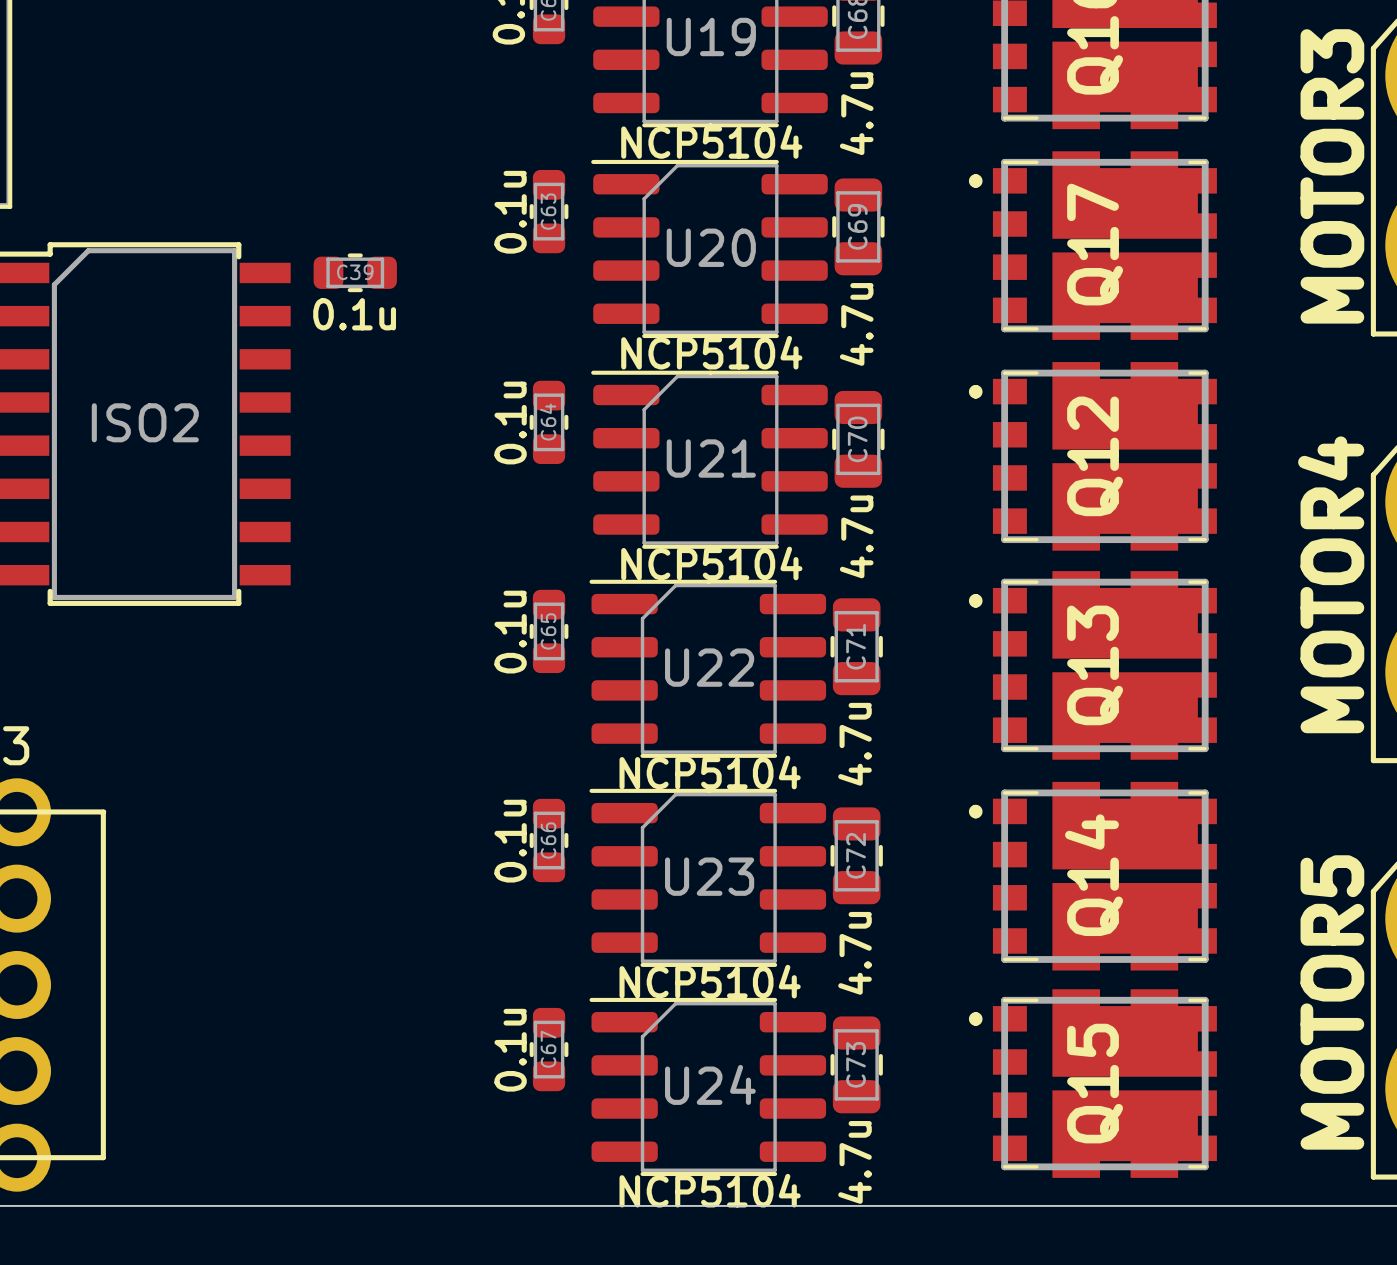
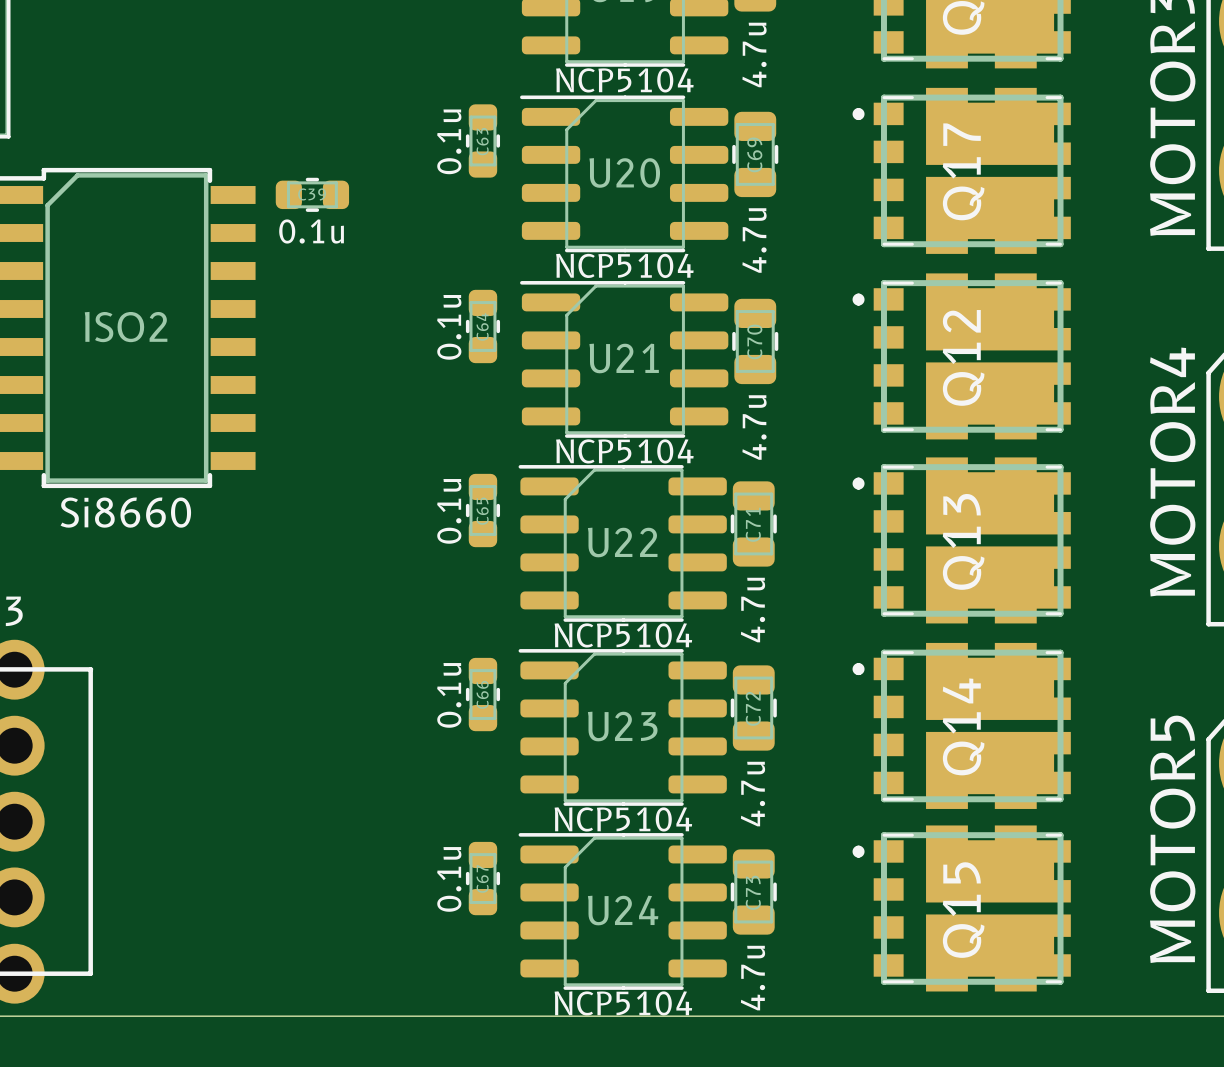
ISO2 value: none -> Si8660 (125, 512)

